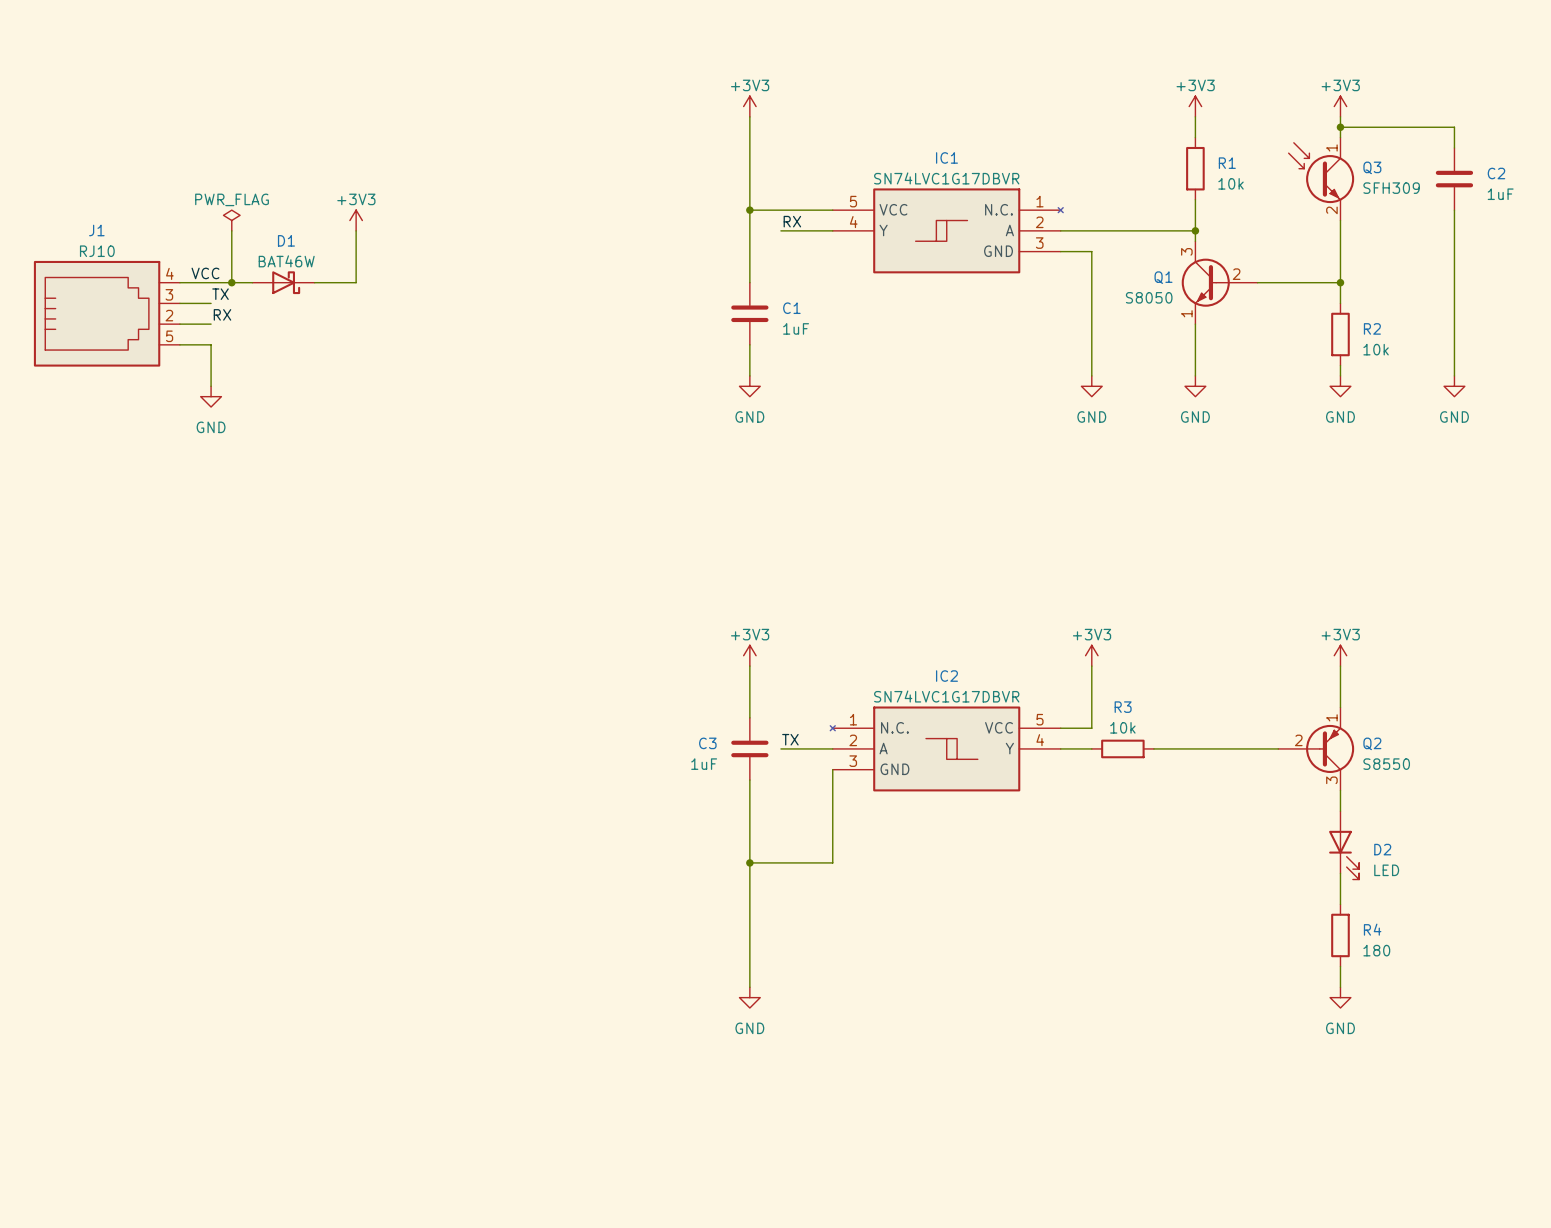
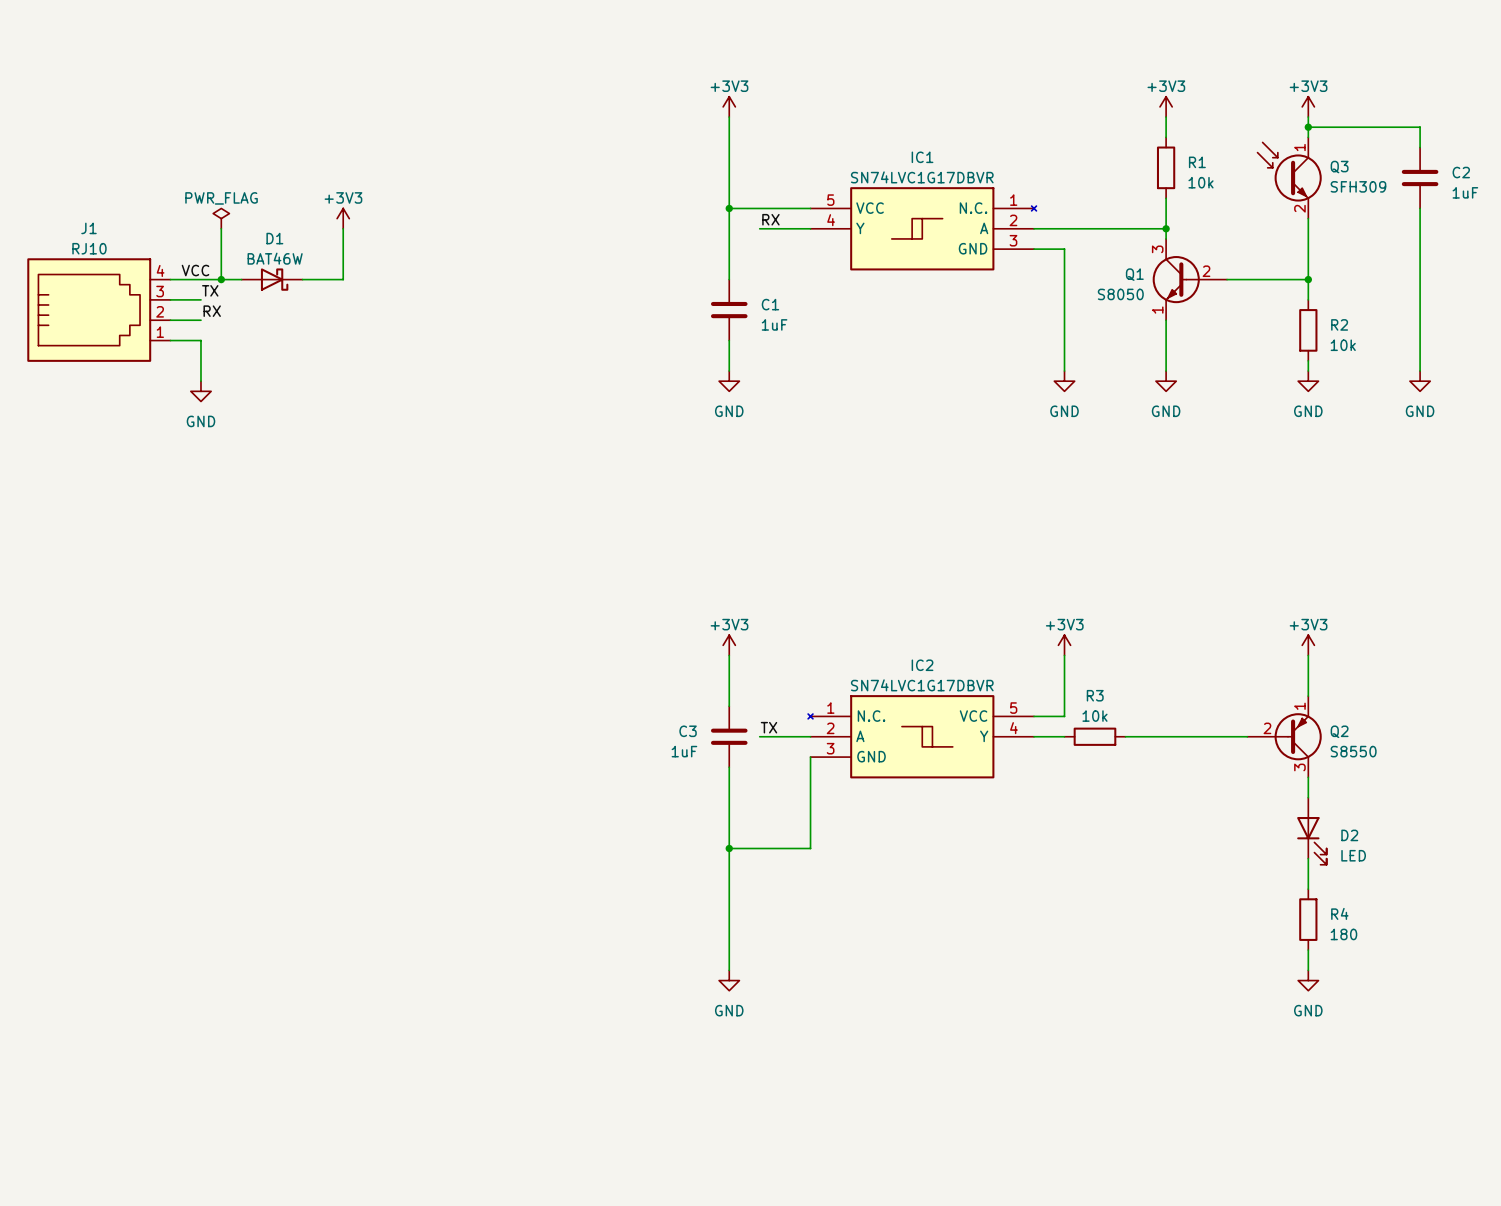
J1 pin number: 5 (169, 336) -> 1 (160, 332)

